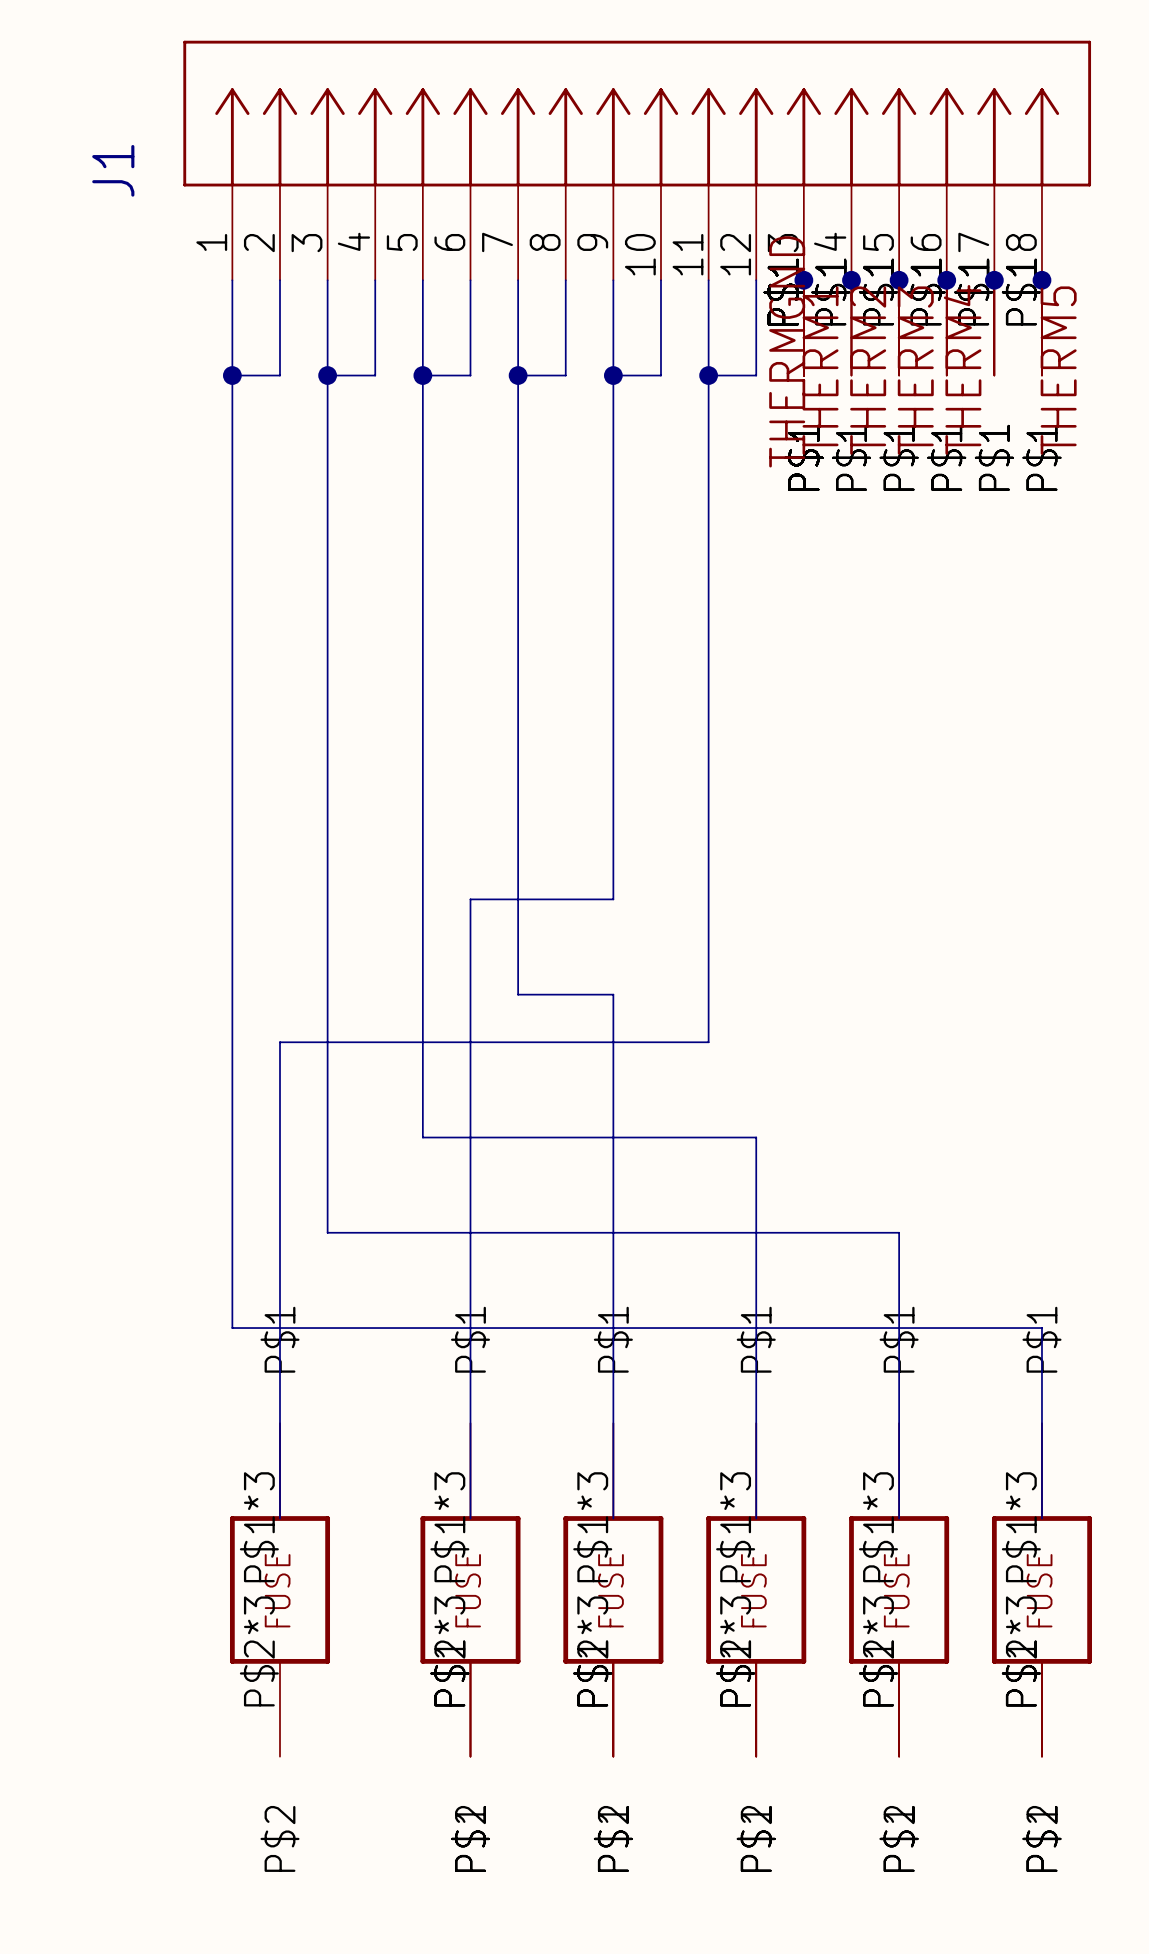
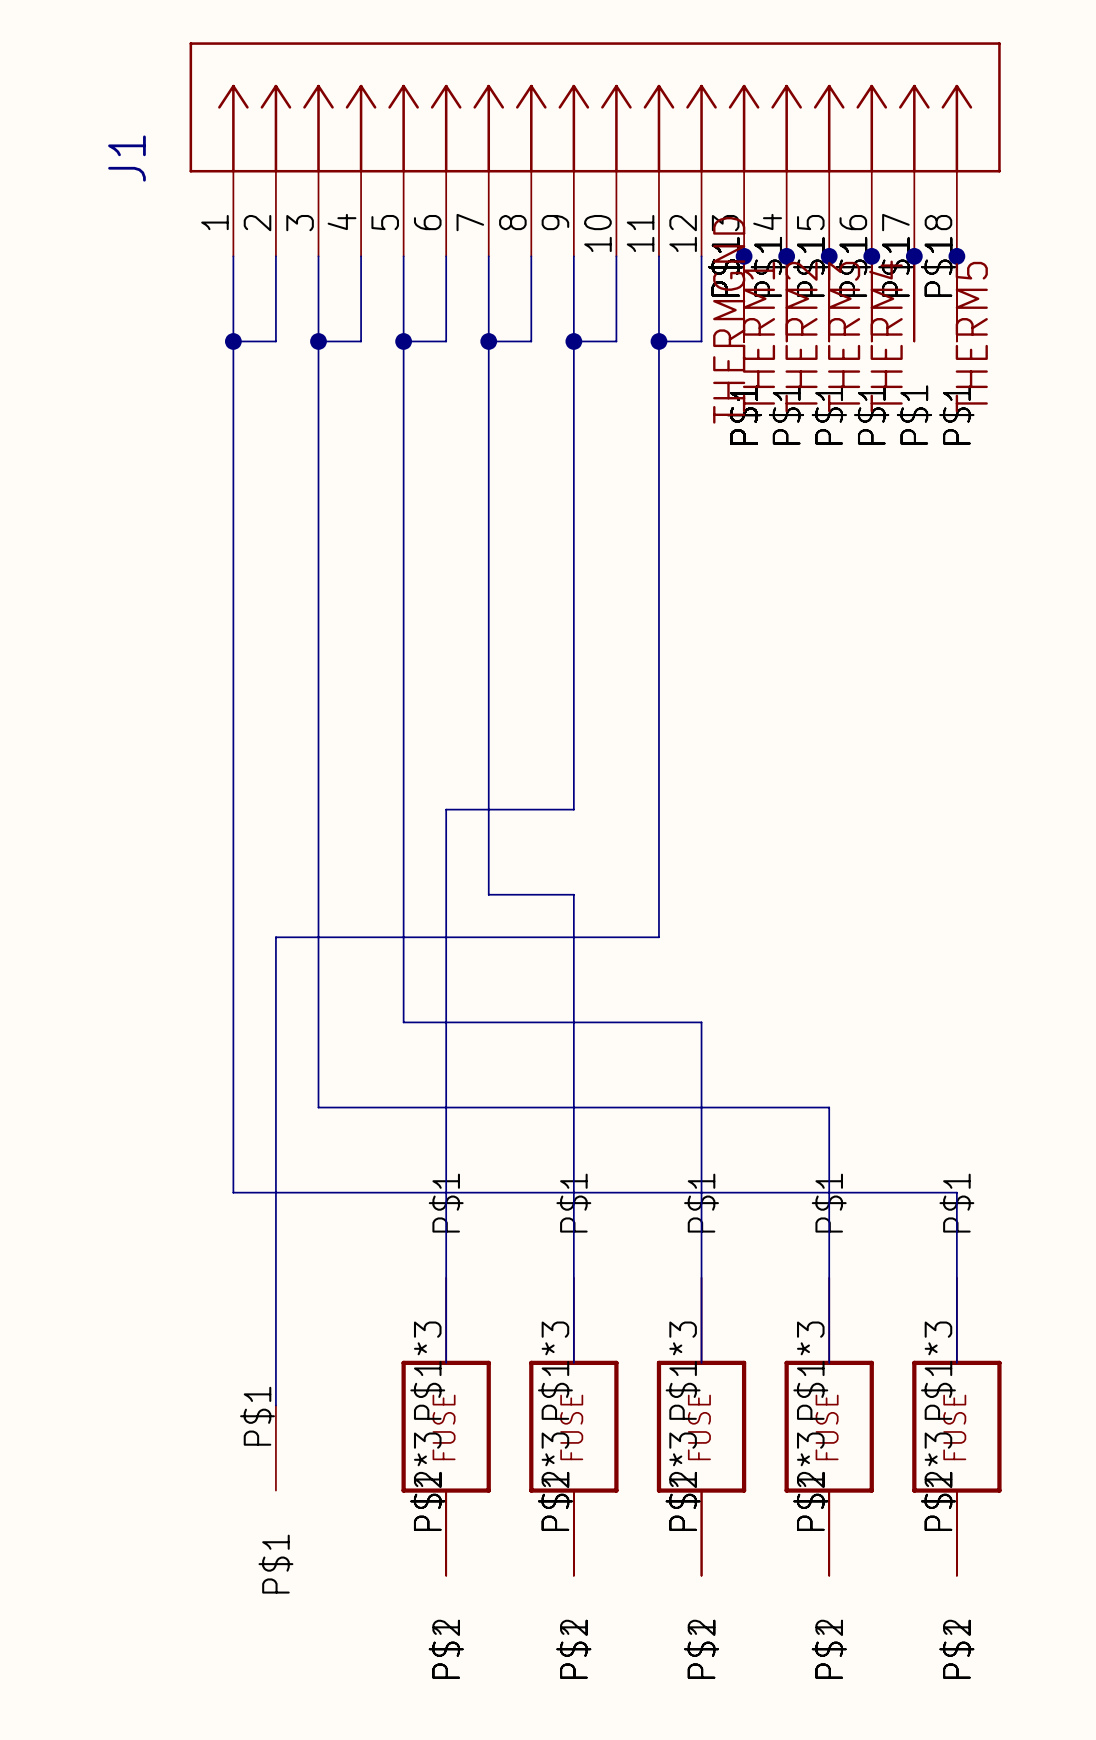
wire: none -> (275, 1362) (275, 1405)
part: (279, 1589) -> none
part: none -> (275, 1448)

